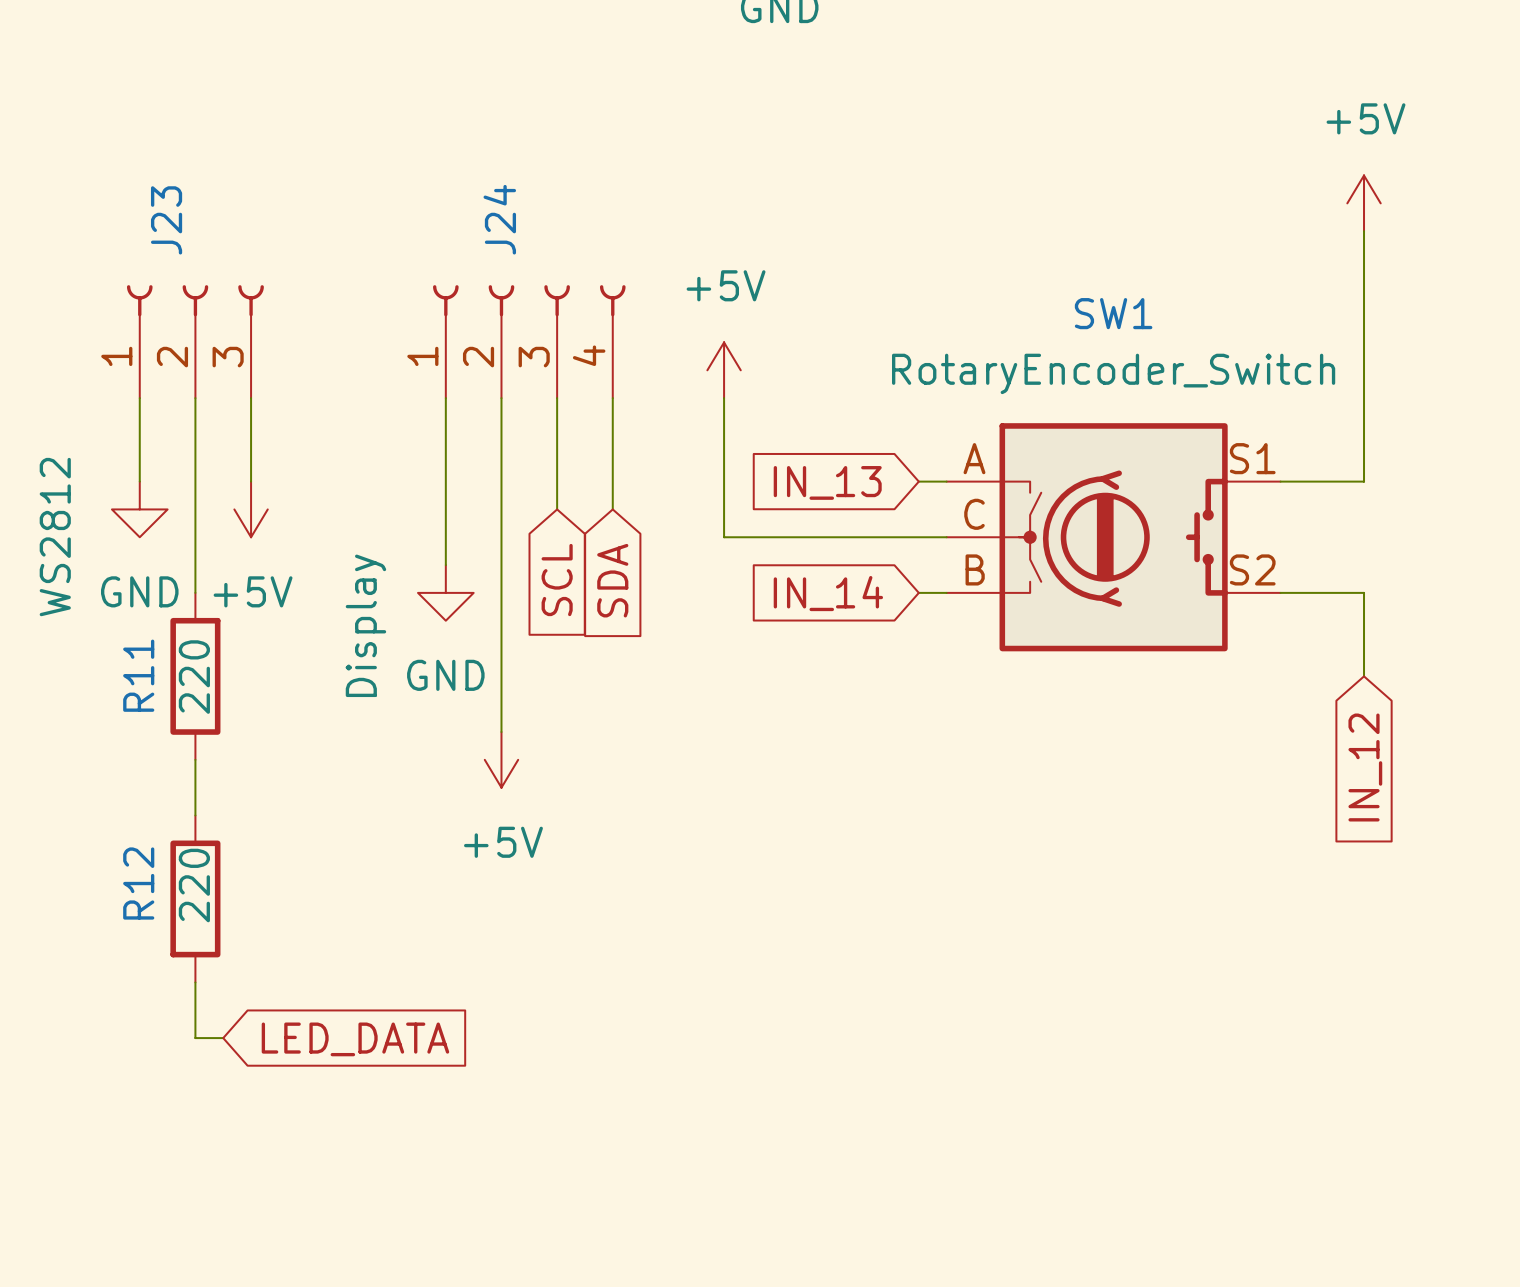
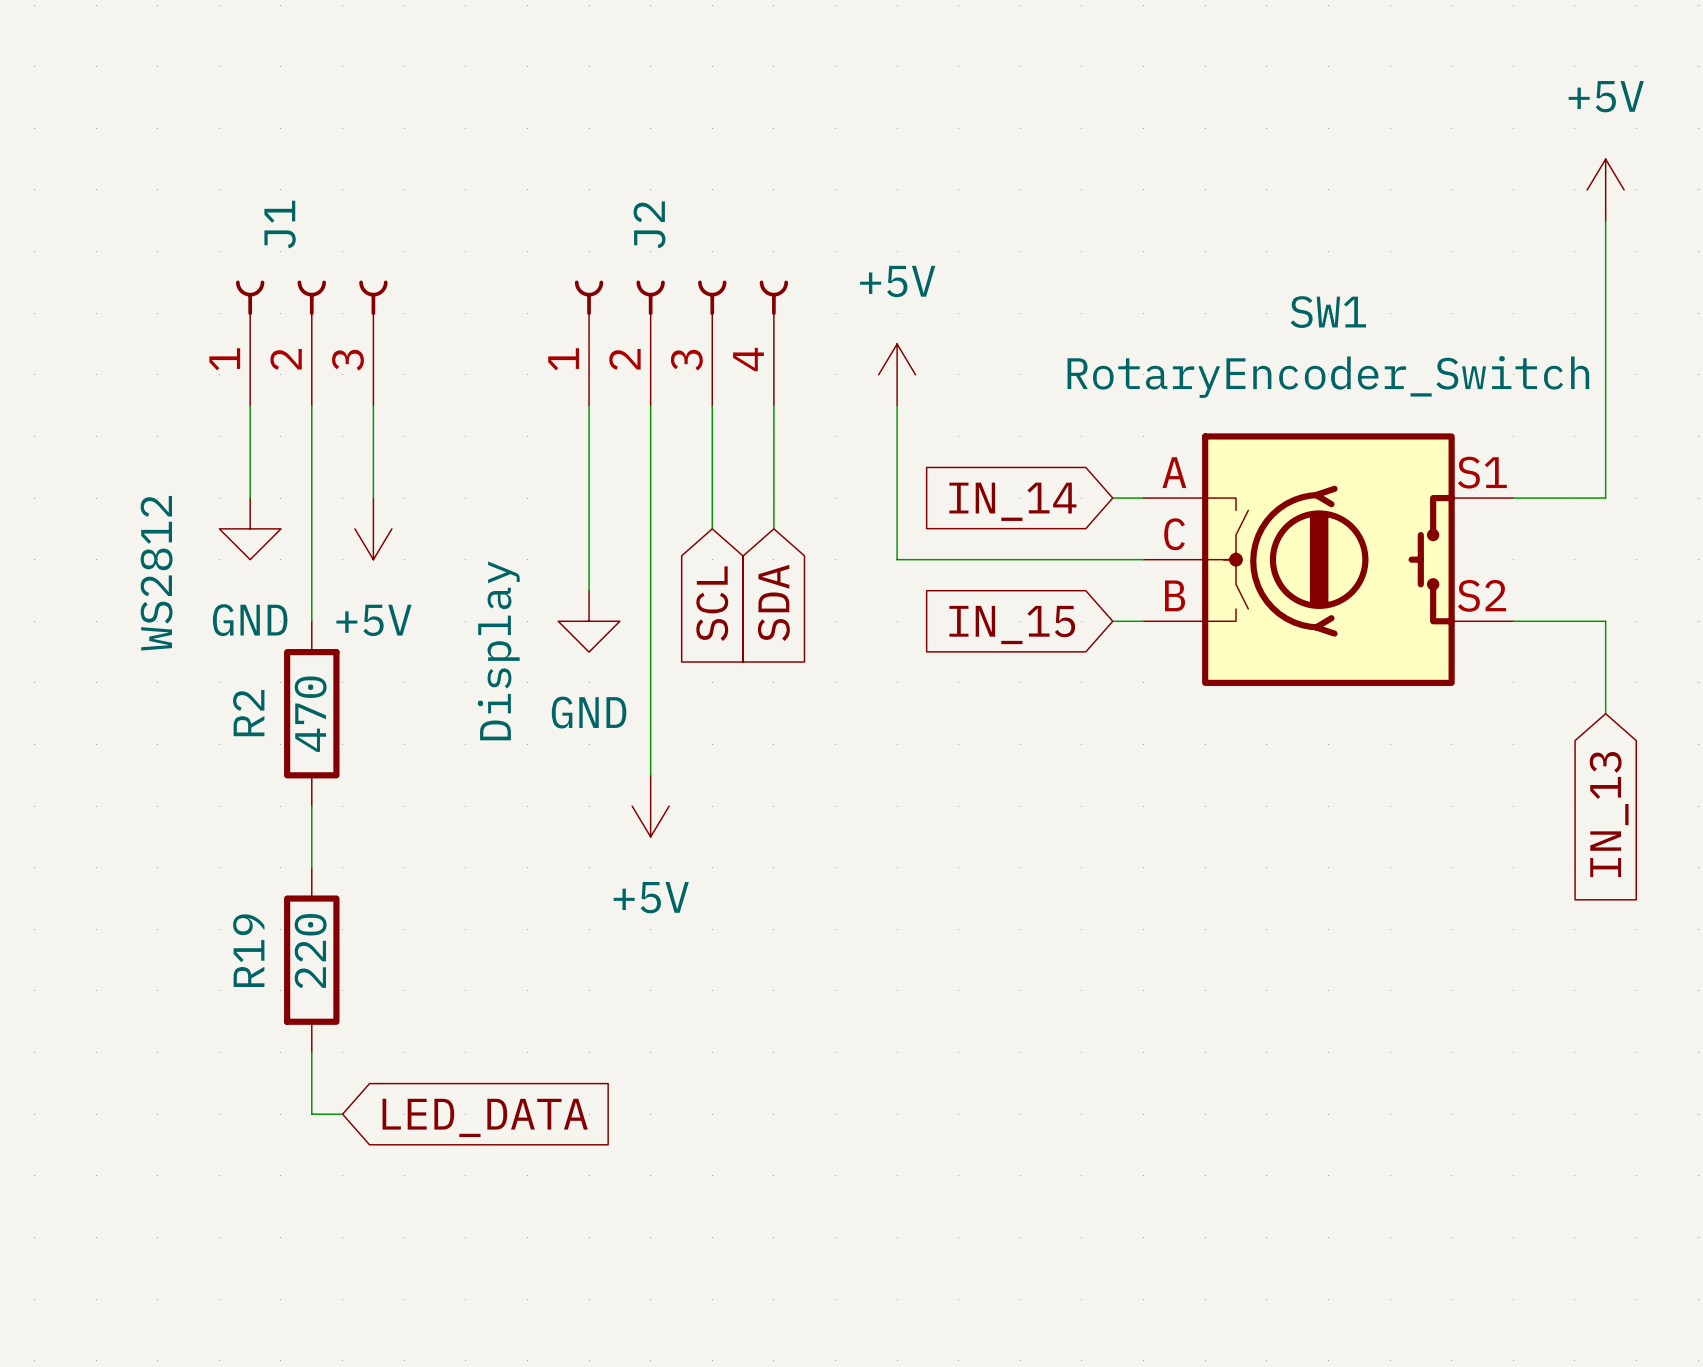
J24 name: J24 (499, 219) -> J2 (649, 224)
J23 name: J23 (166, 220) -> J1 (280, 224)
global label: IN_13 (827, 482) -> IN_14 (1012, 501)
global label: IN_14 (828, 593) -> IN_15 (1012, 625)
R11 name: R11 (138, 675) -> R2 (248, 713)
R11 value: 220 (194, 677) -> 470 (310, 714)
global label: IN_12 (1365, 767) -> IN_13 (1609, 814)
R12 name: R12 (138, 883) -> R19 (248, 950)

